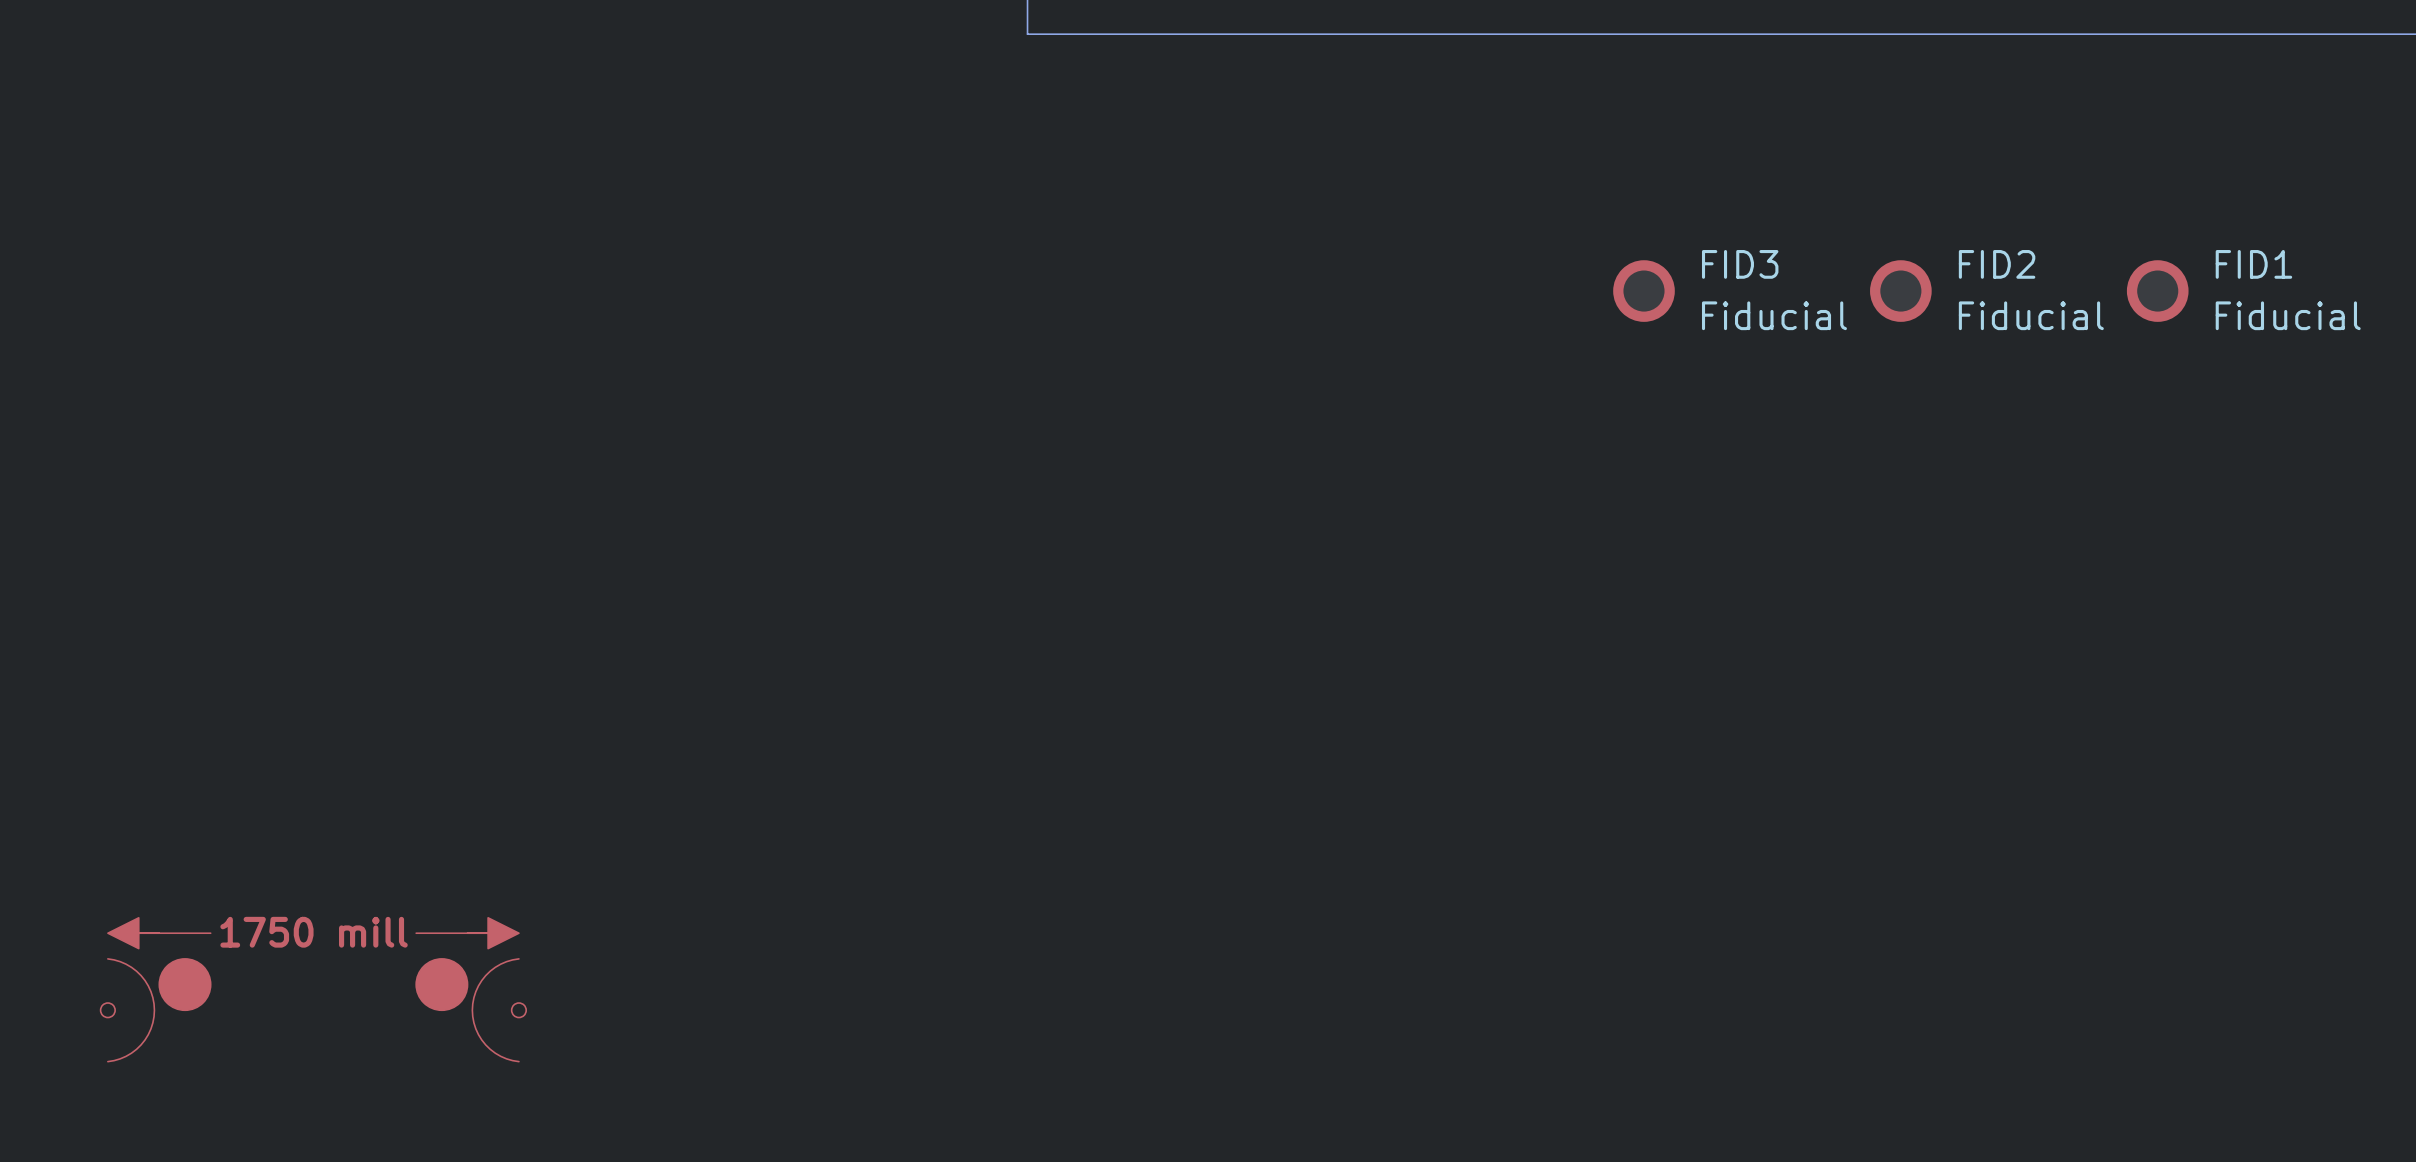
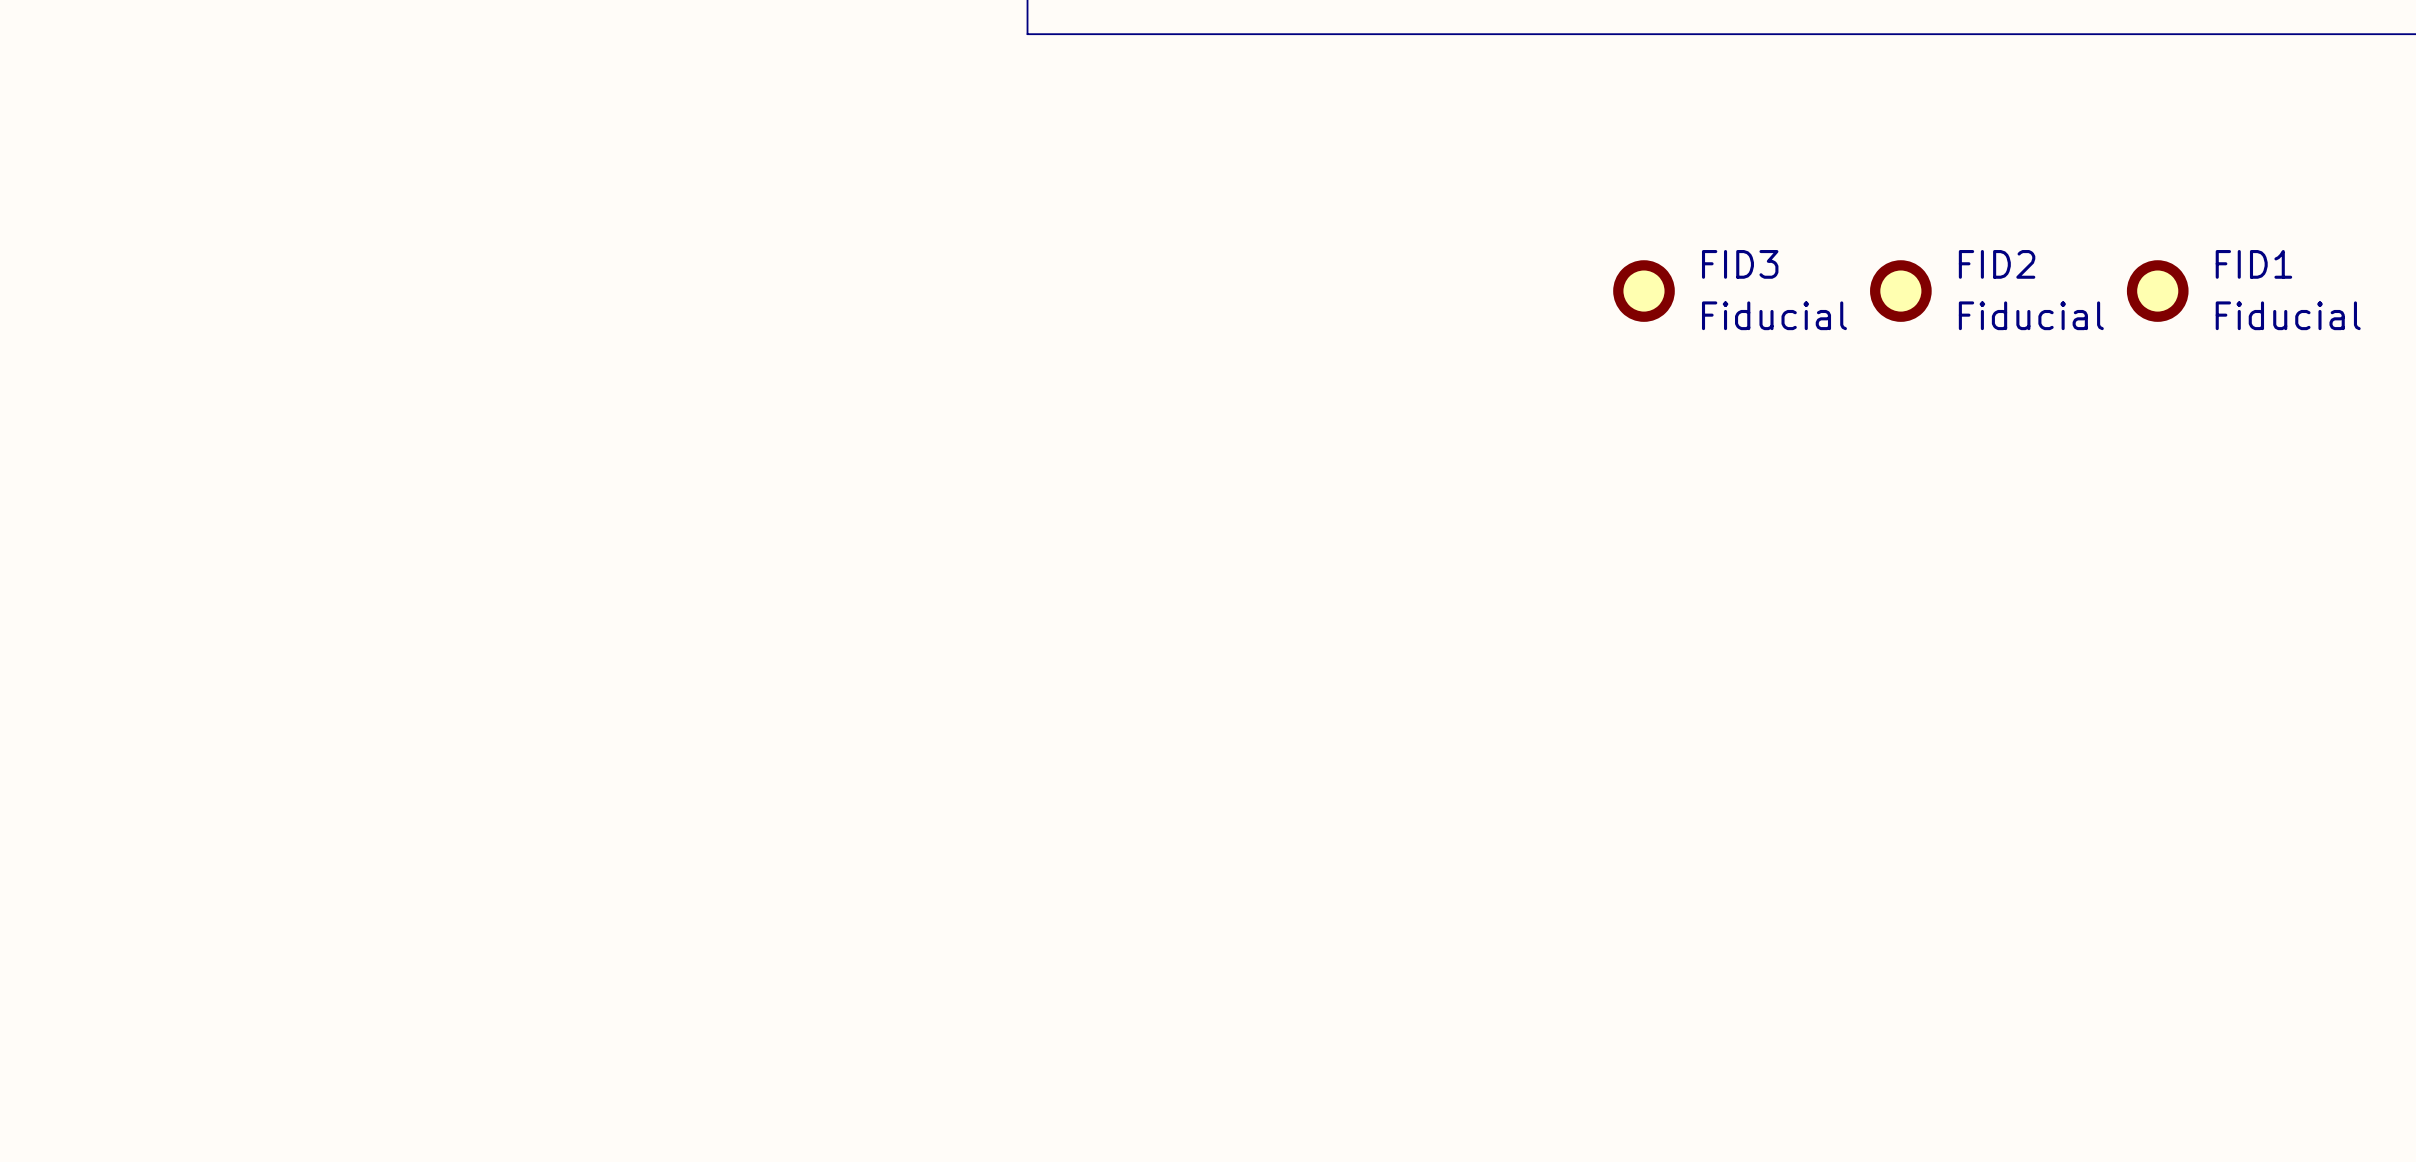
part: (313, 989) -> none

